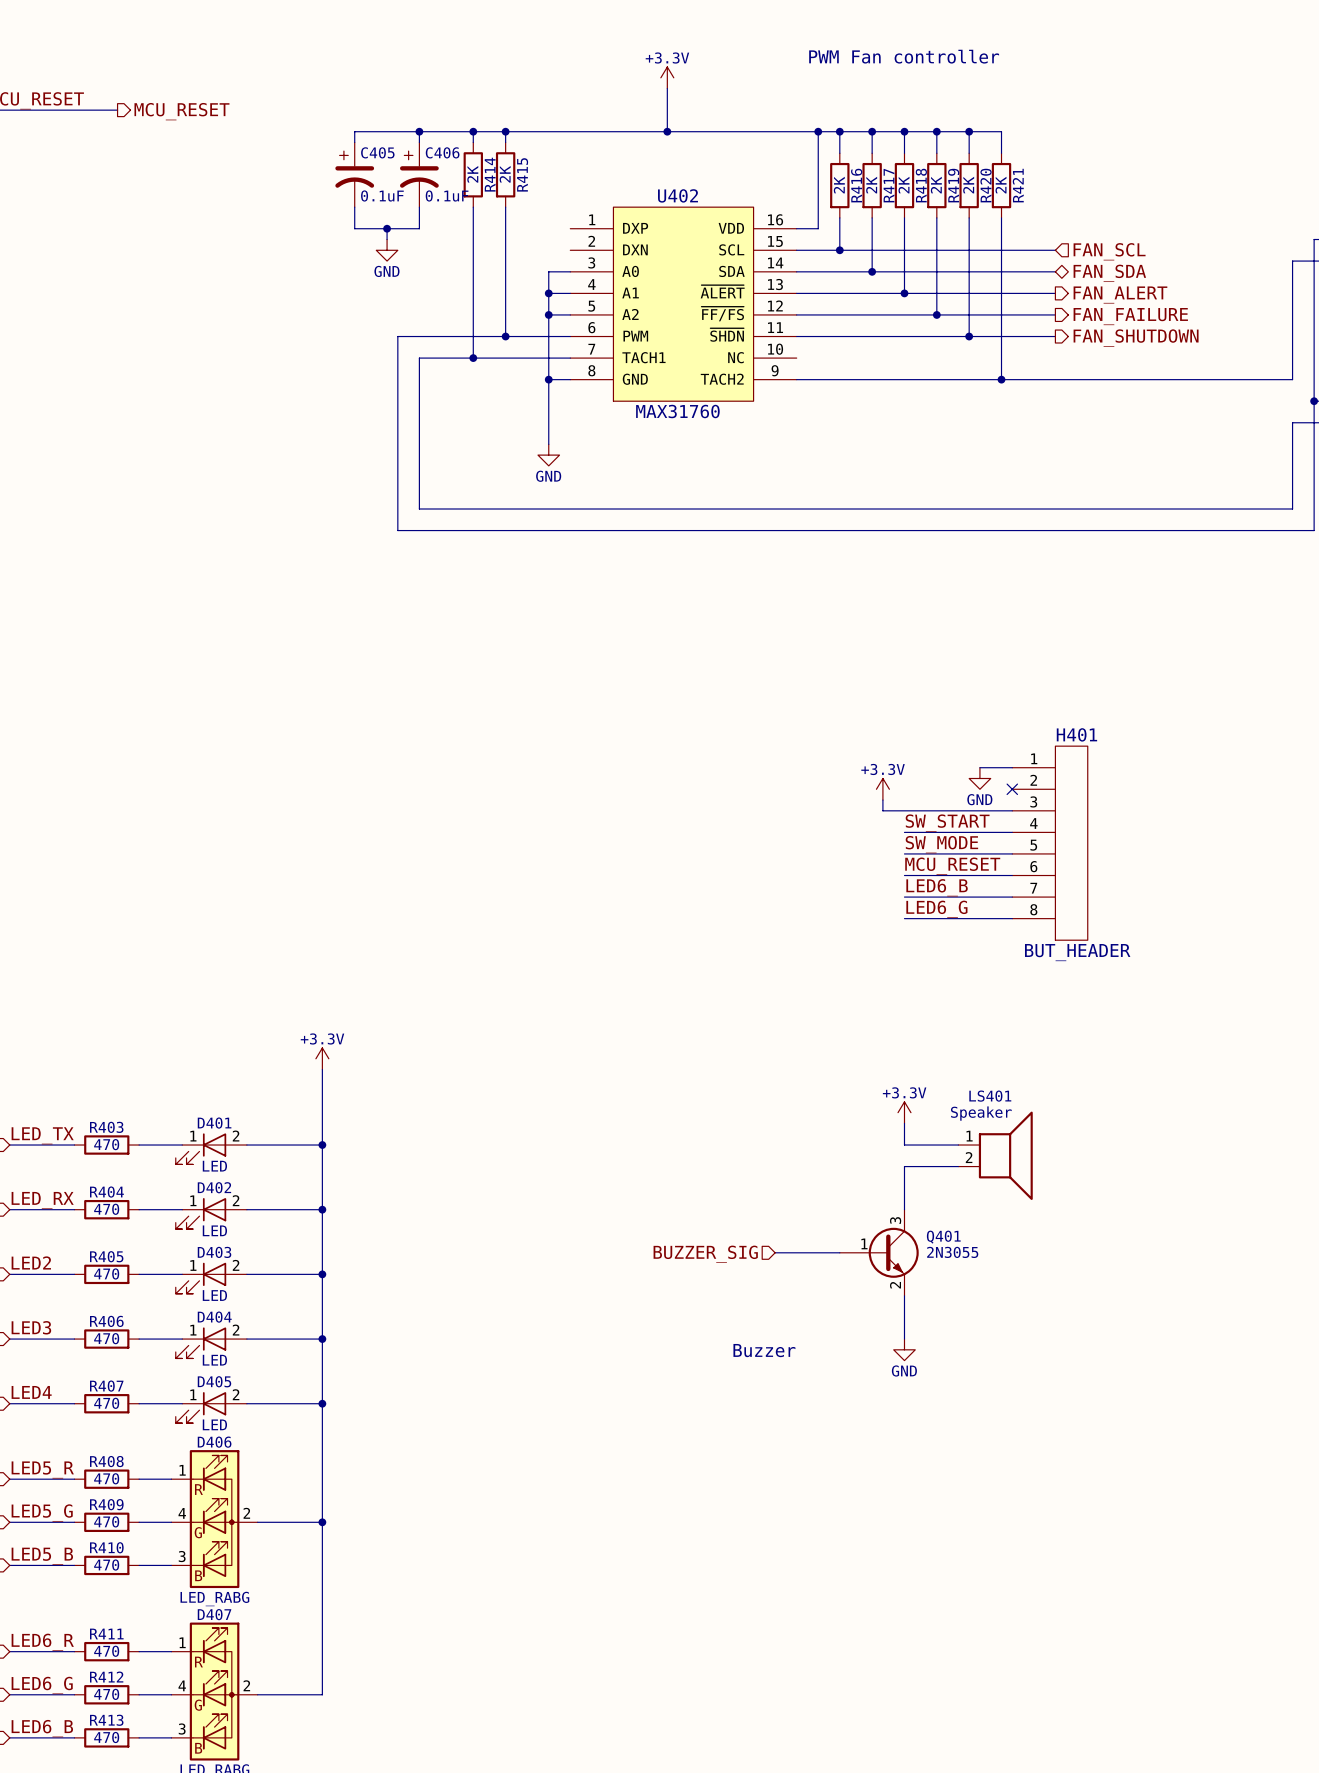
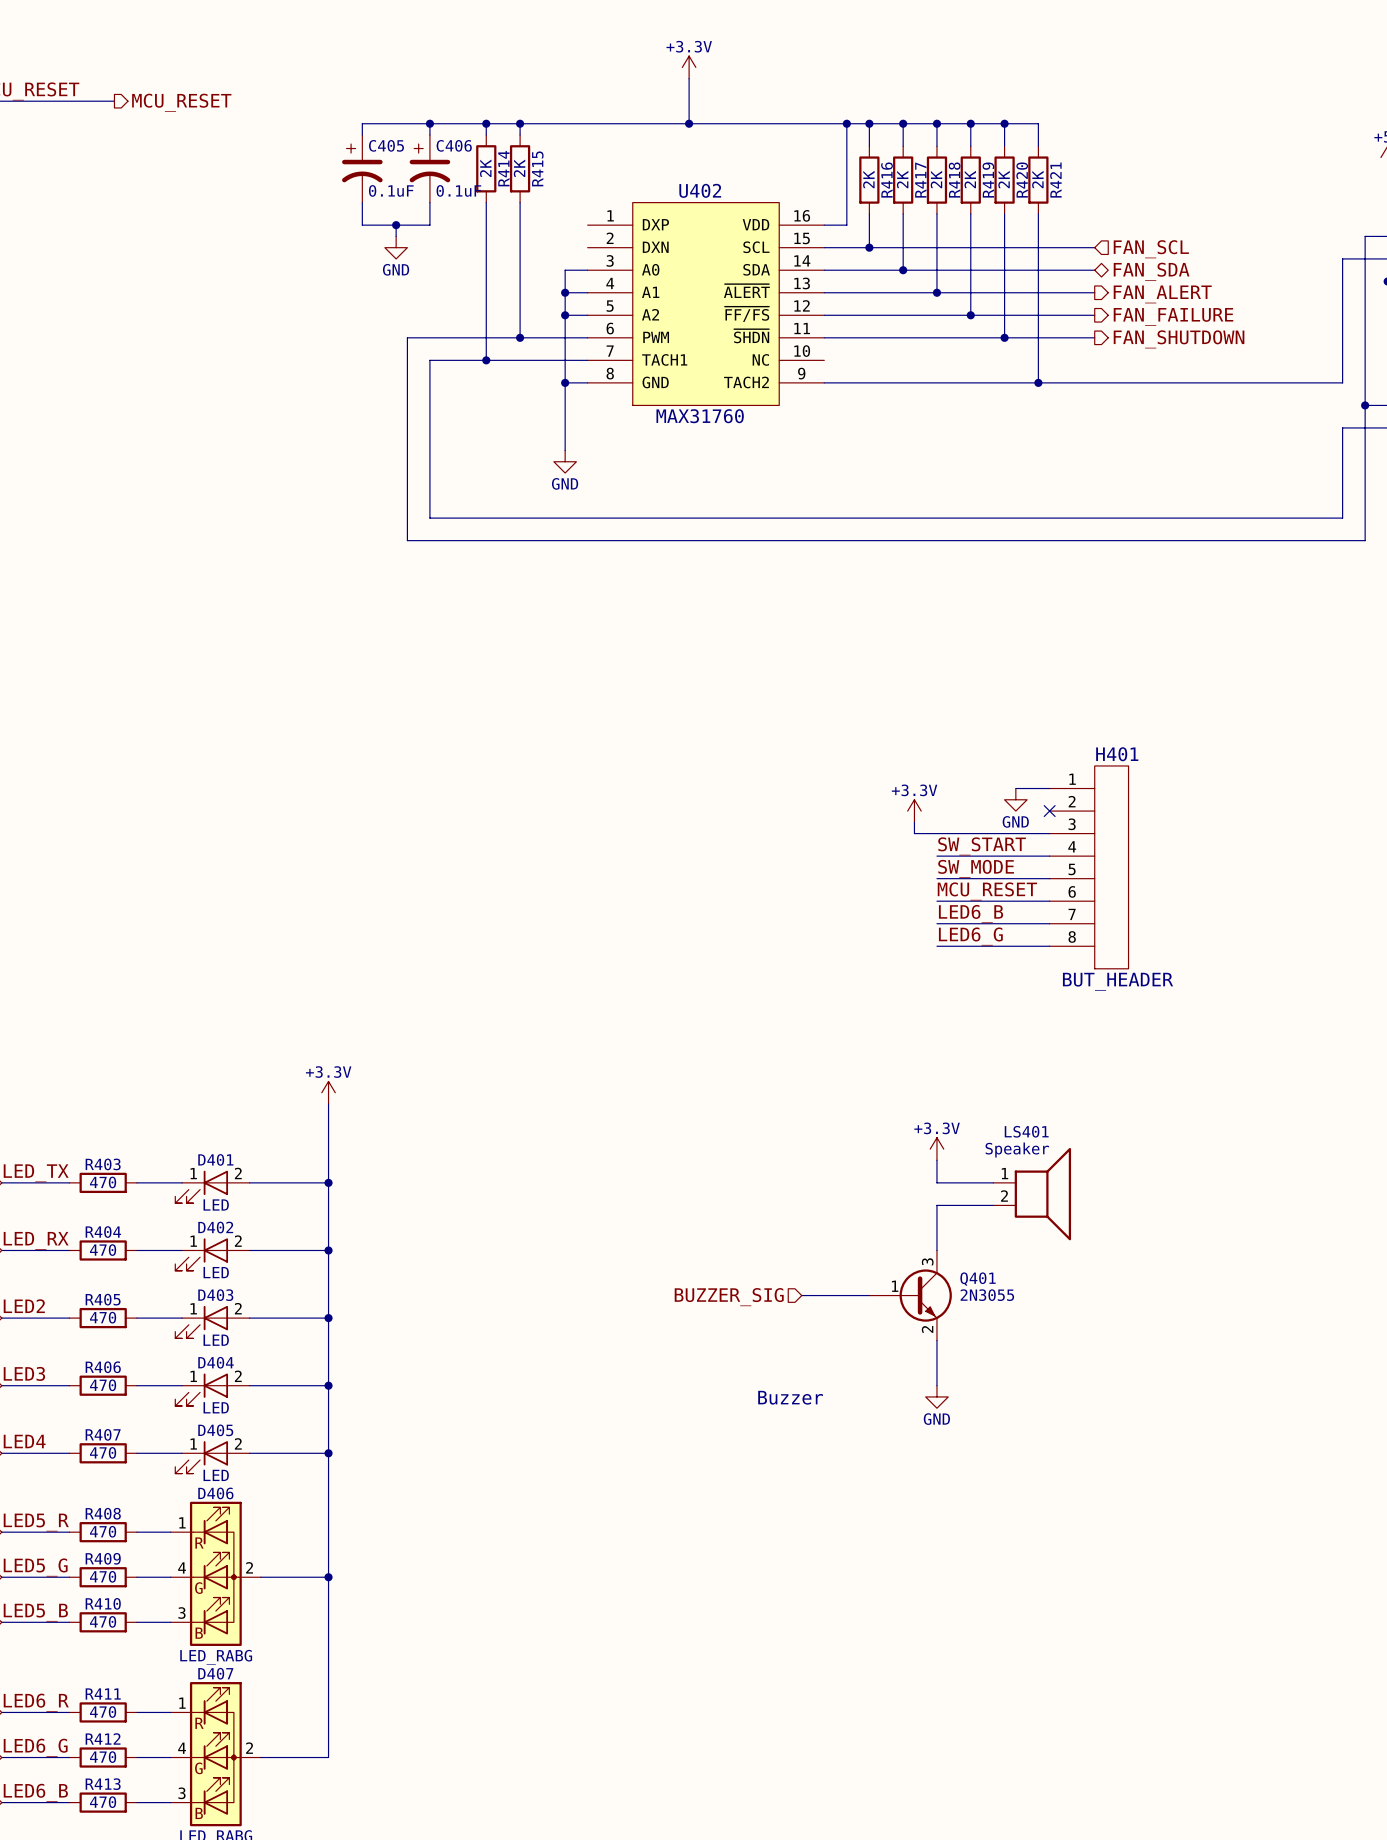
text: PWM Fan controller (904, 56) -> none

